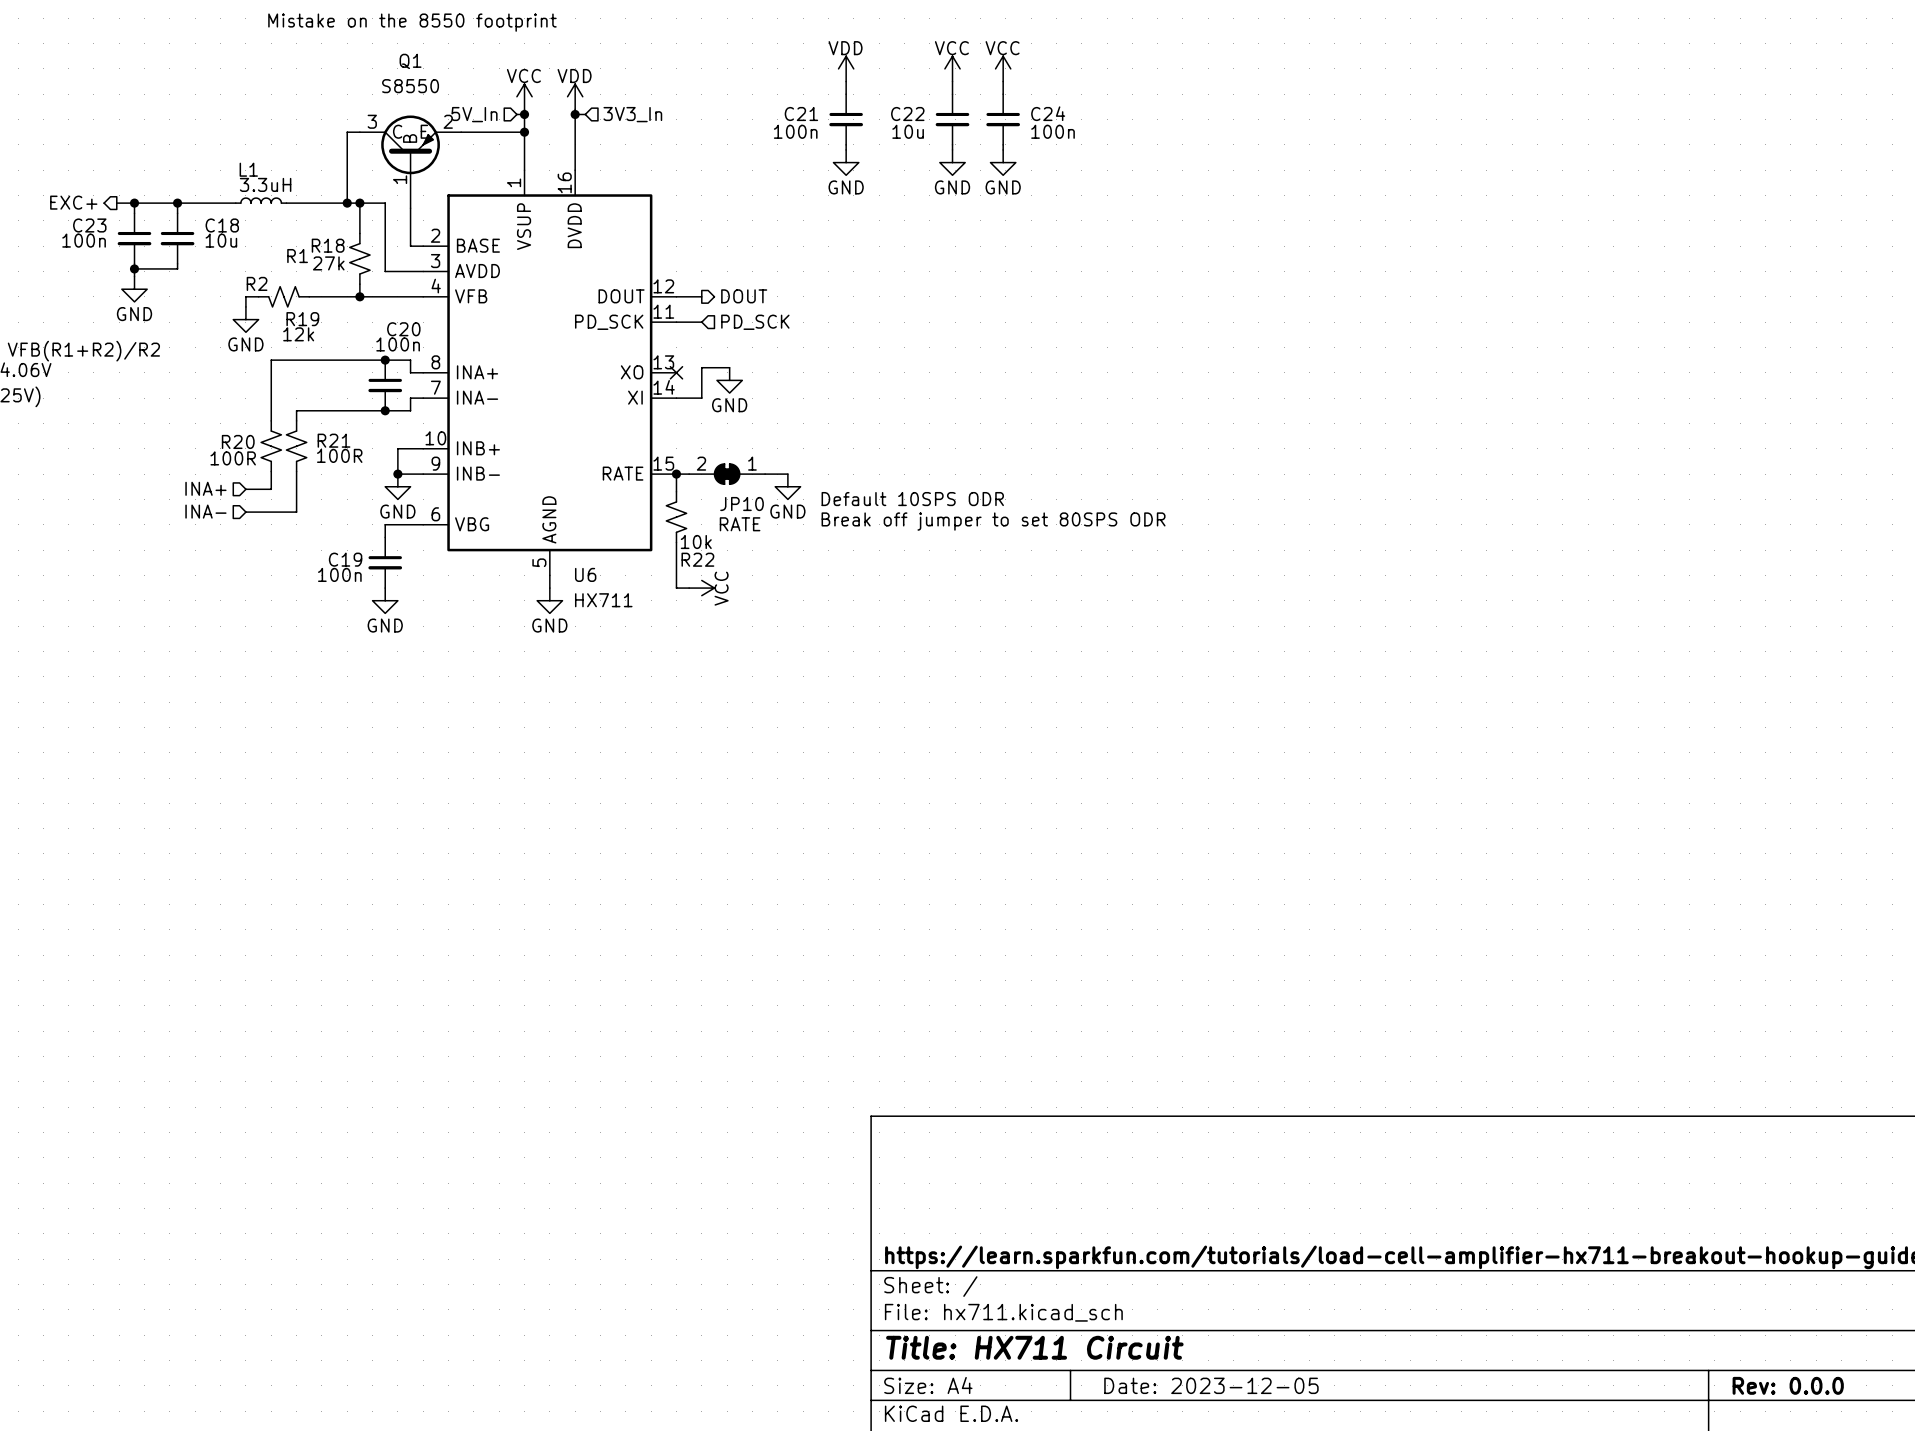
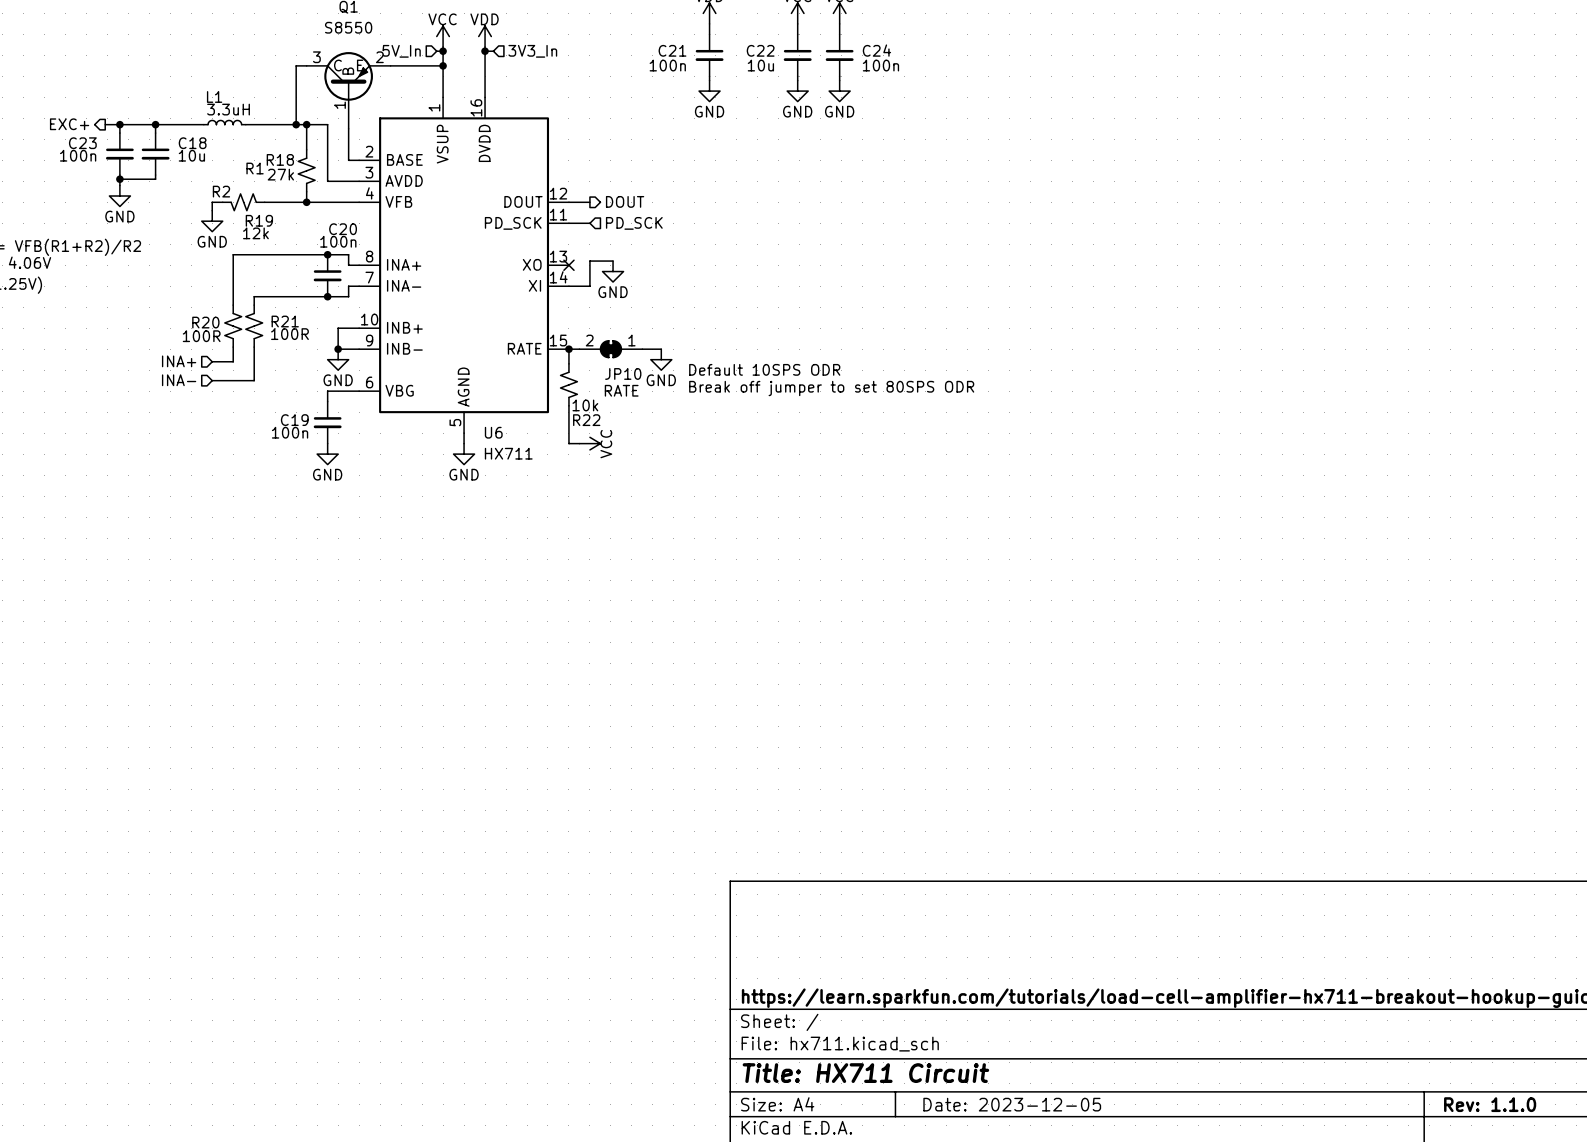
title block: Rev: 0.0.0 (1788, 1385) -> Rev: 1.1.0 (1490, 1104)

